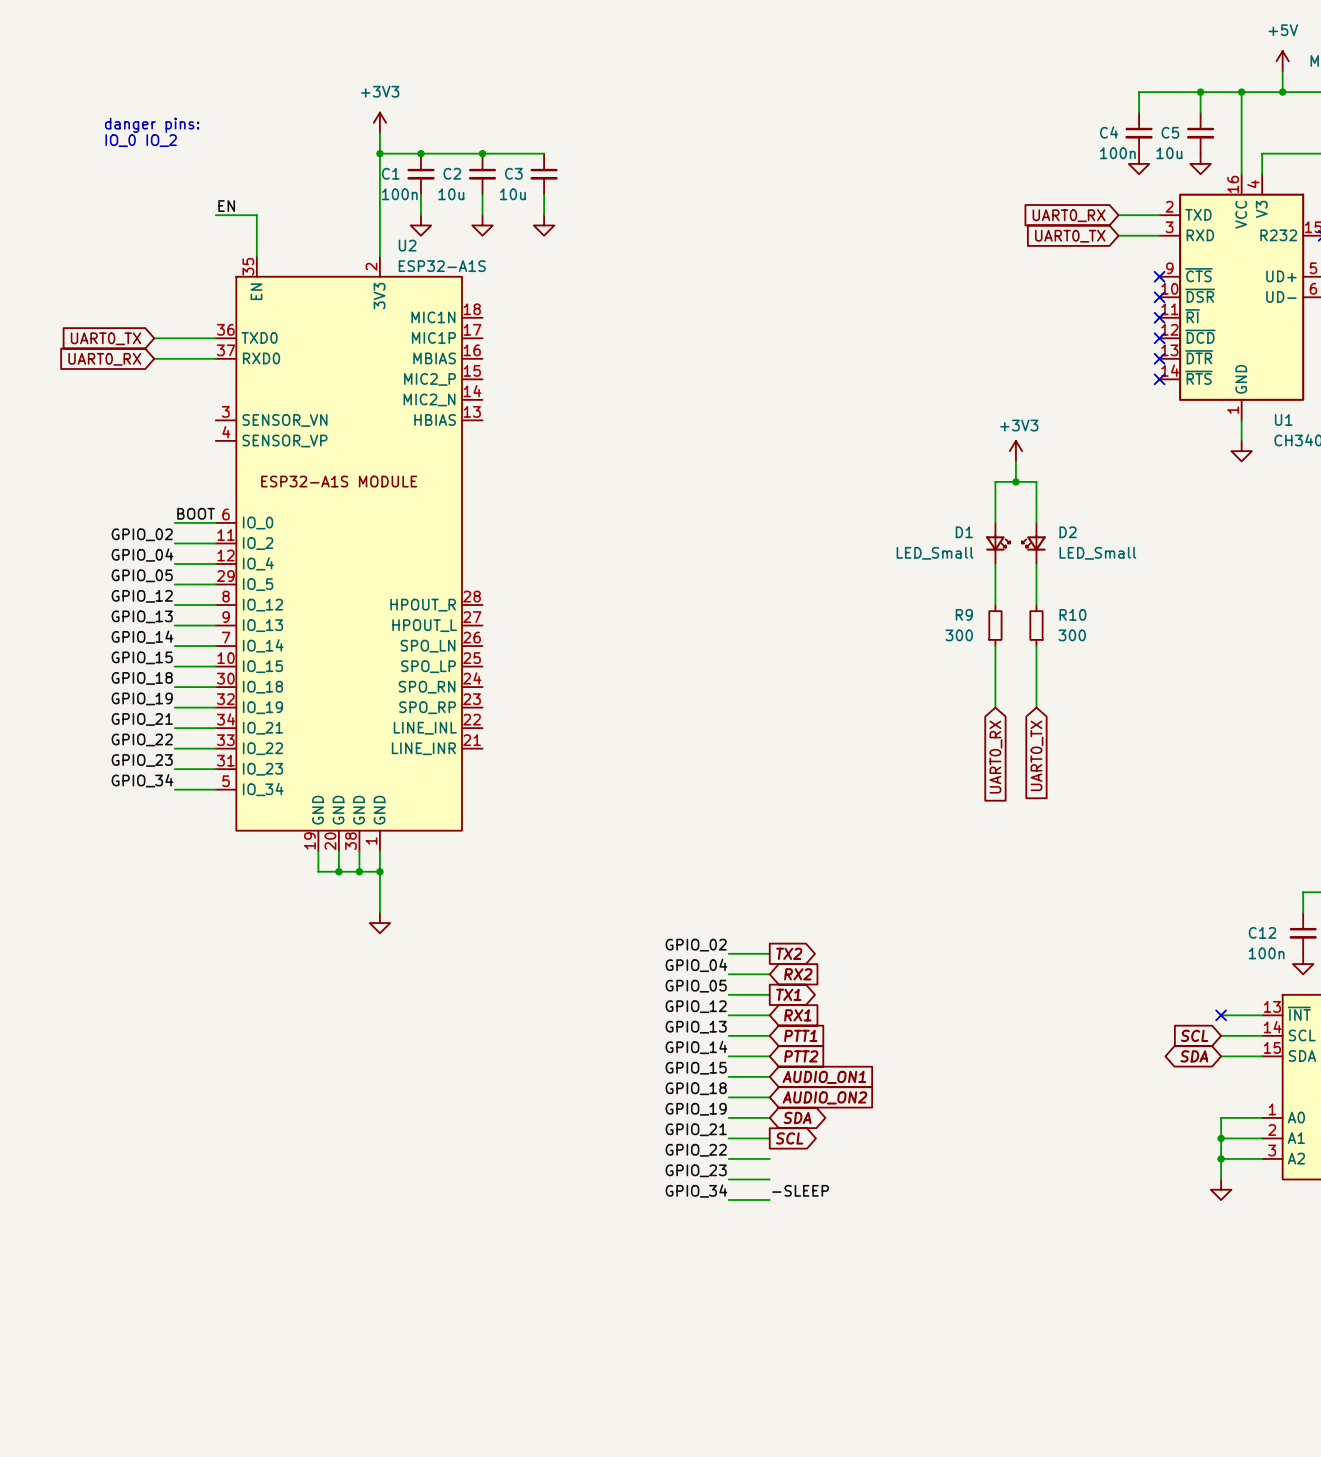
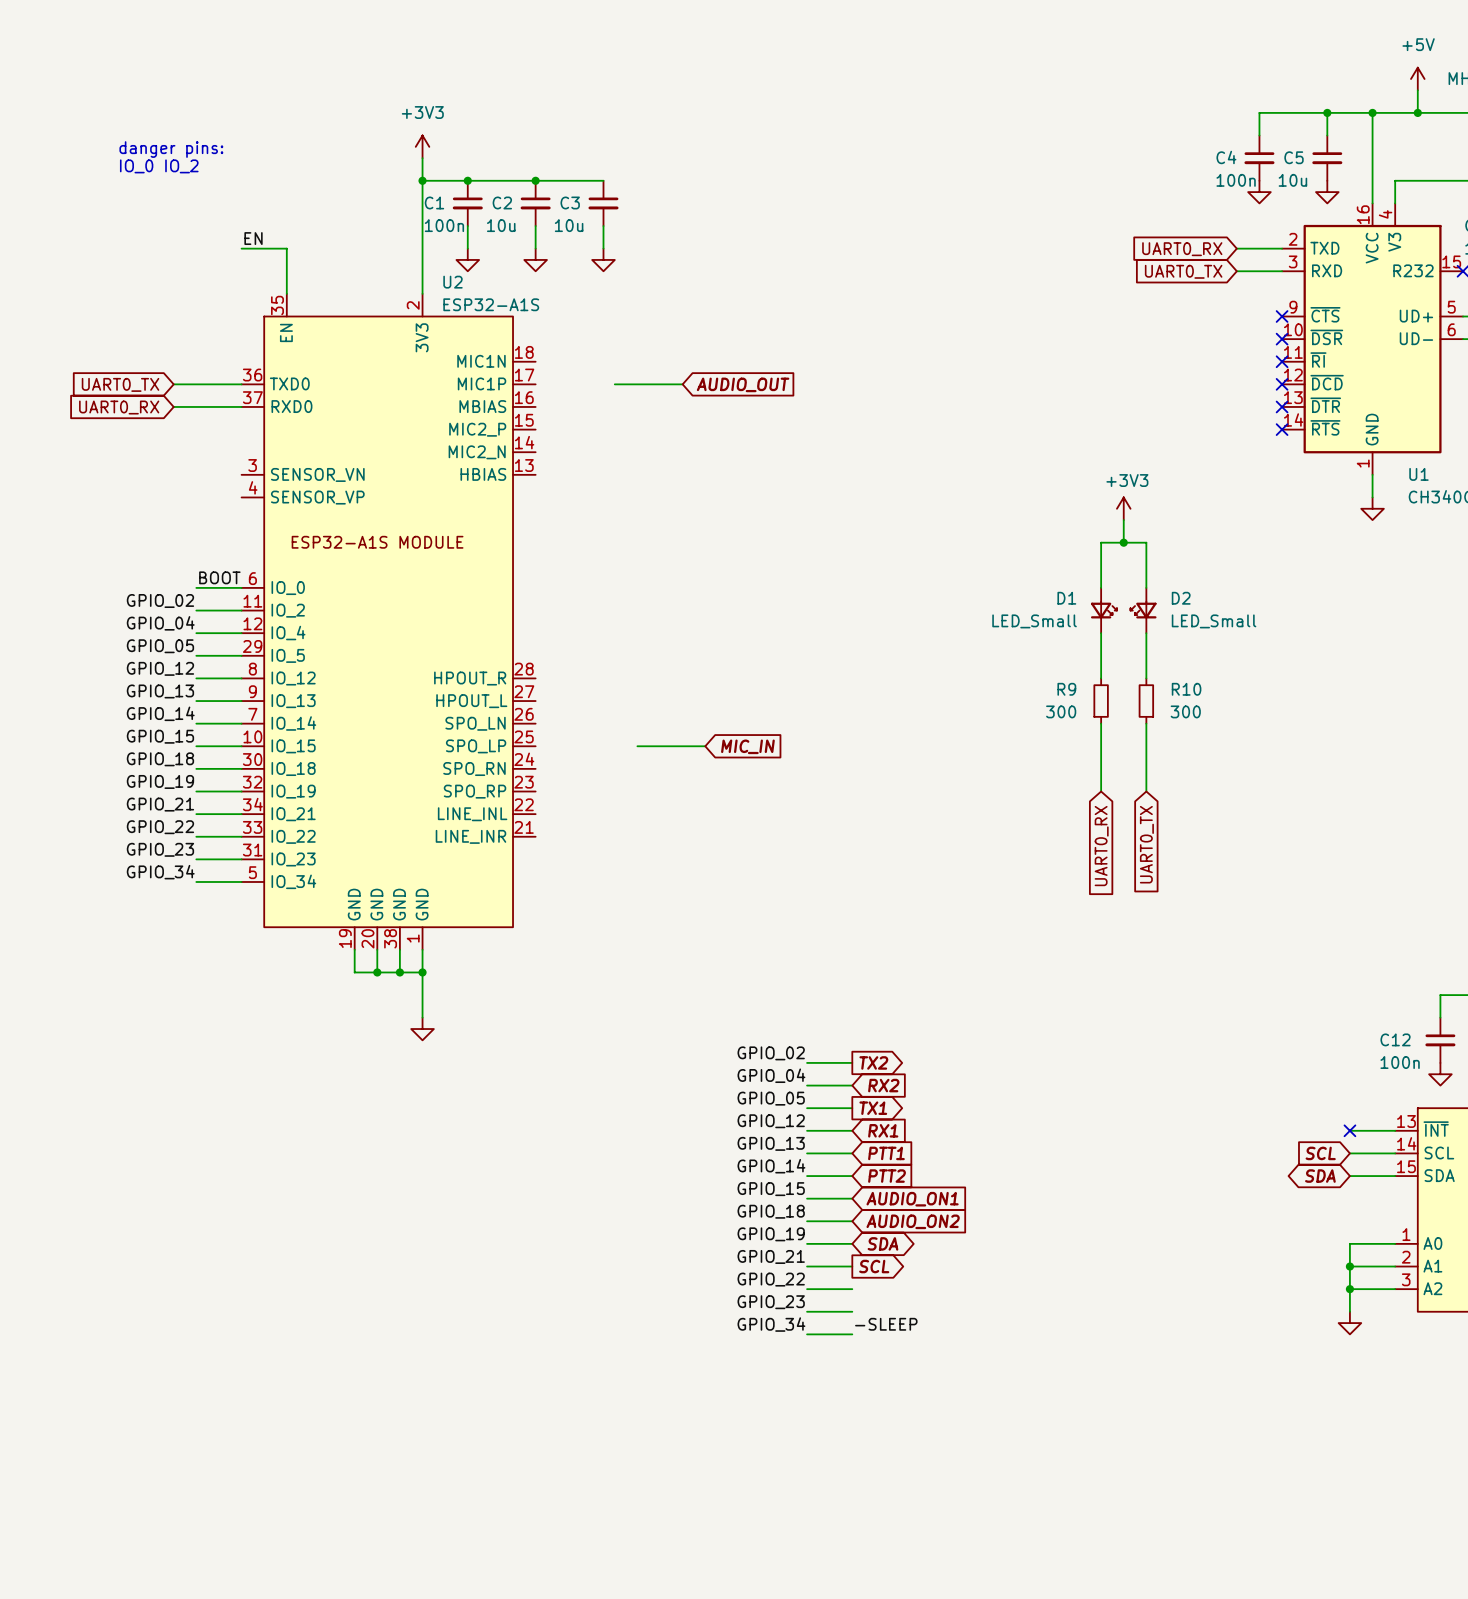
wire: none -> (614, 384) (682, 384)
global label: none -> AUDIO_OUT (743, 384)
wire: none -> (637, 746) (705, 746)
global label: none -> MIC_IN (747, 746)

